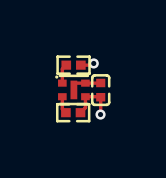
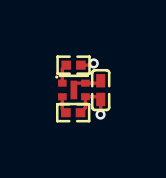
part footprint: [90, 74, 111, 107] -> [90, 68, 111, 112]

